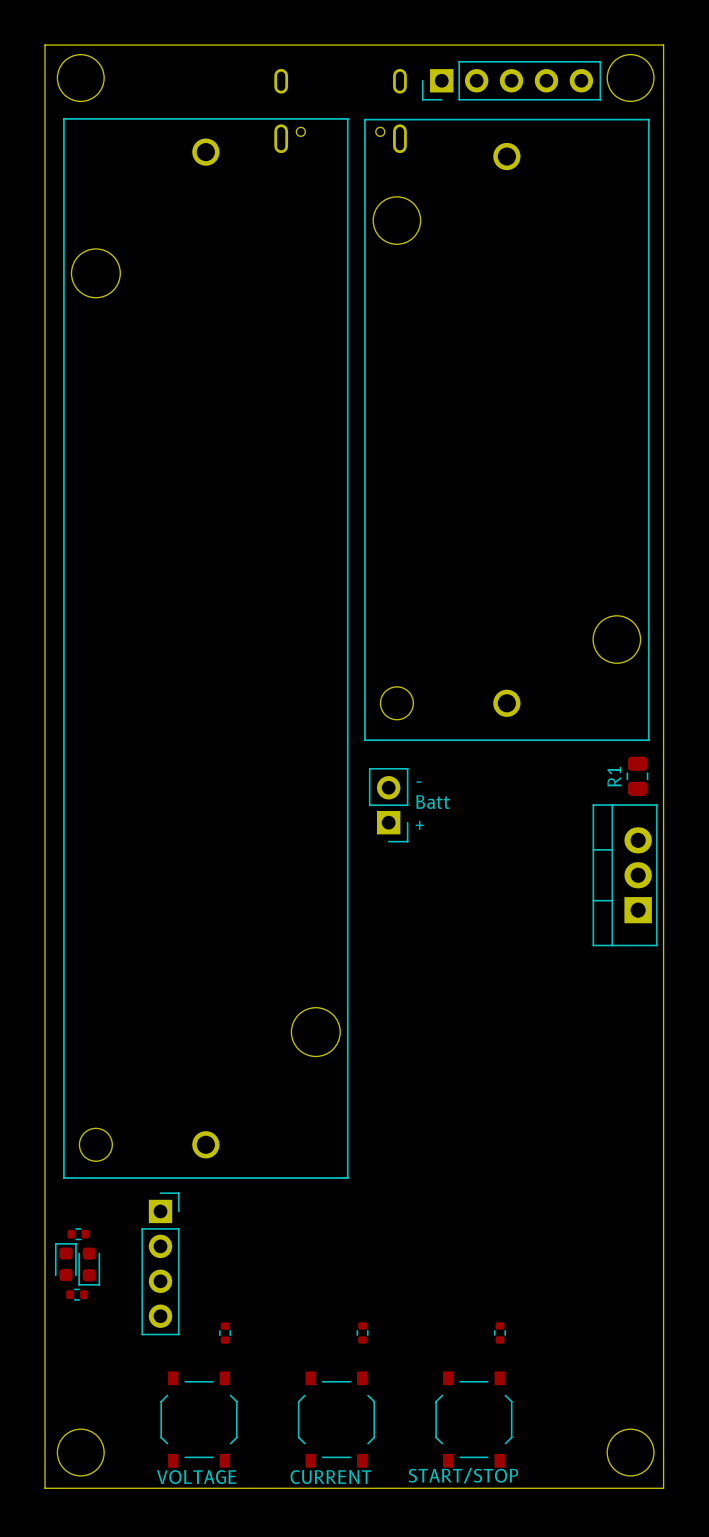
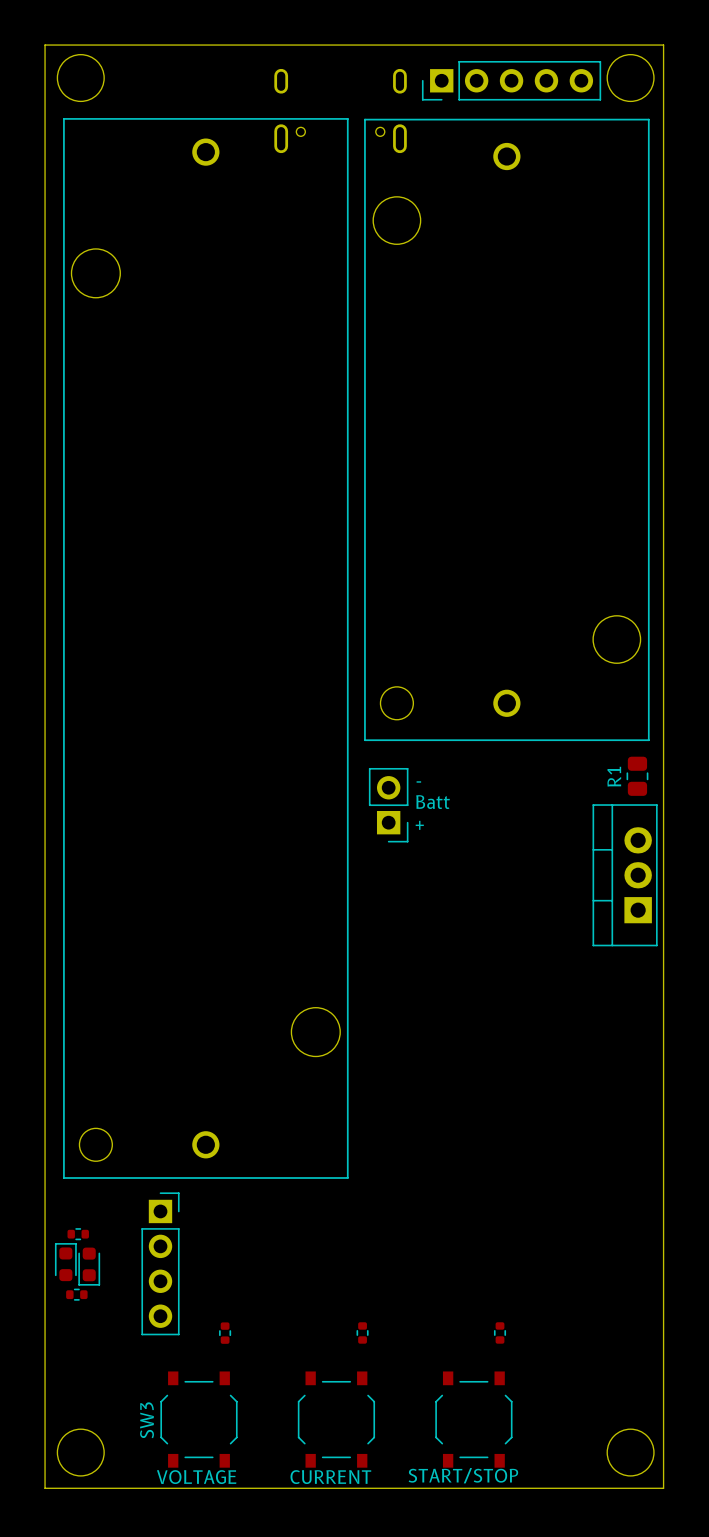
SW3 name: none -> SW3 (147, 1420)

